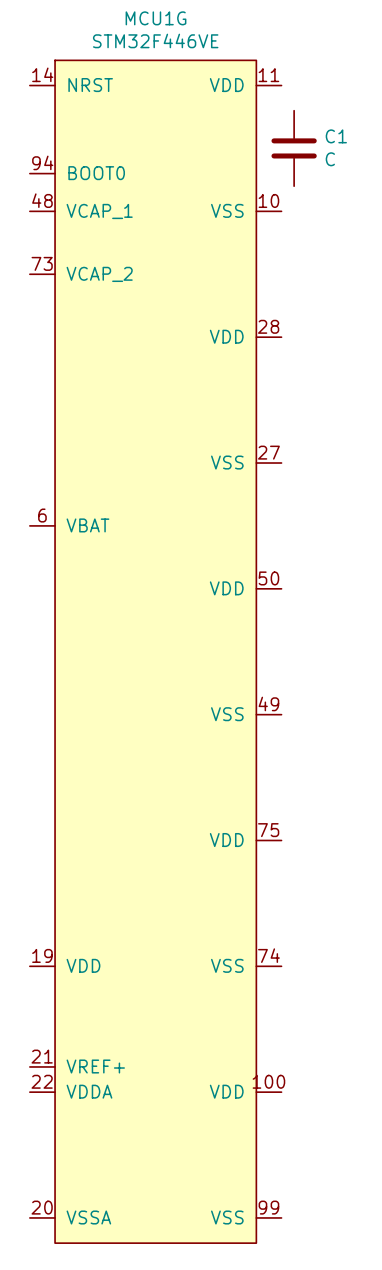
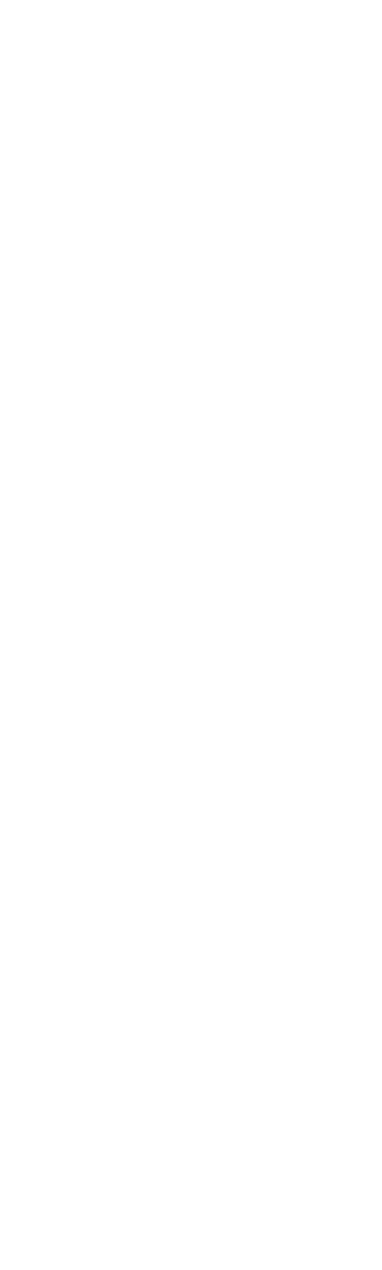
C1: C (294, 148) -> none
MCU1G: STM32F446VE (155, 651) -> none

